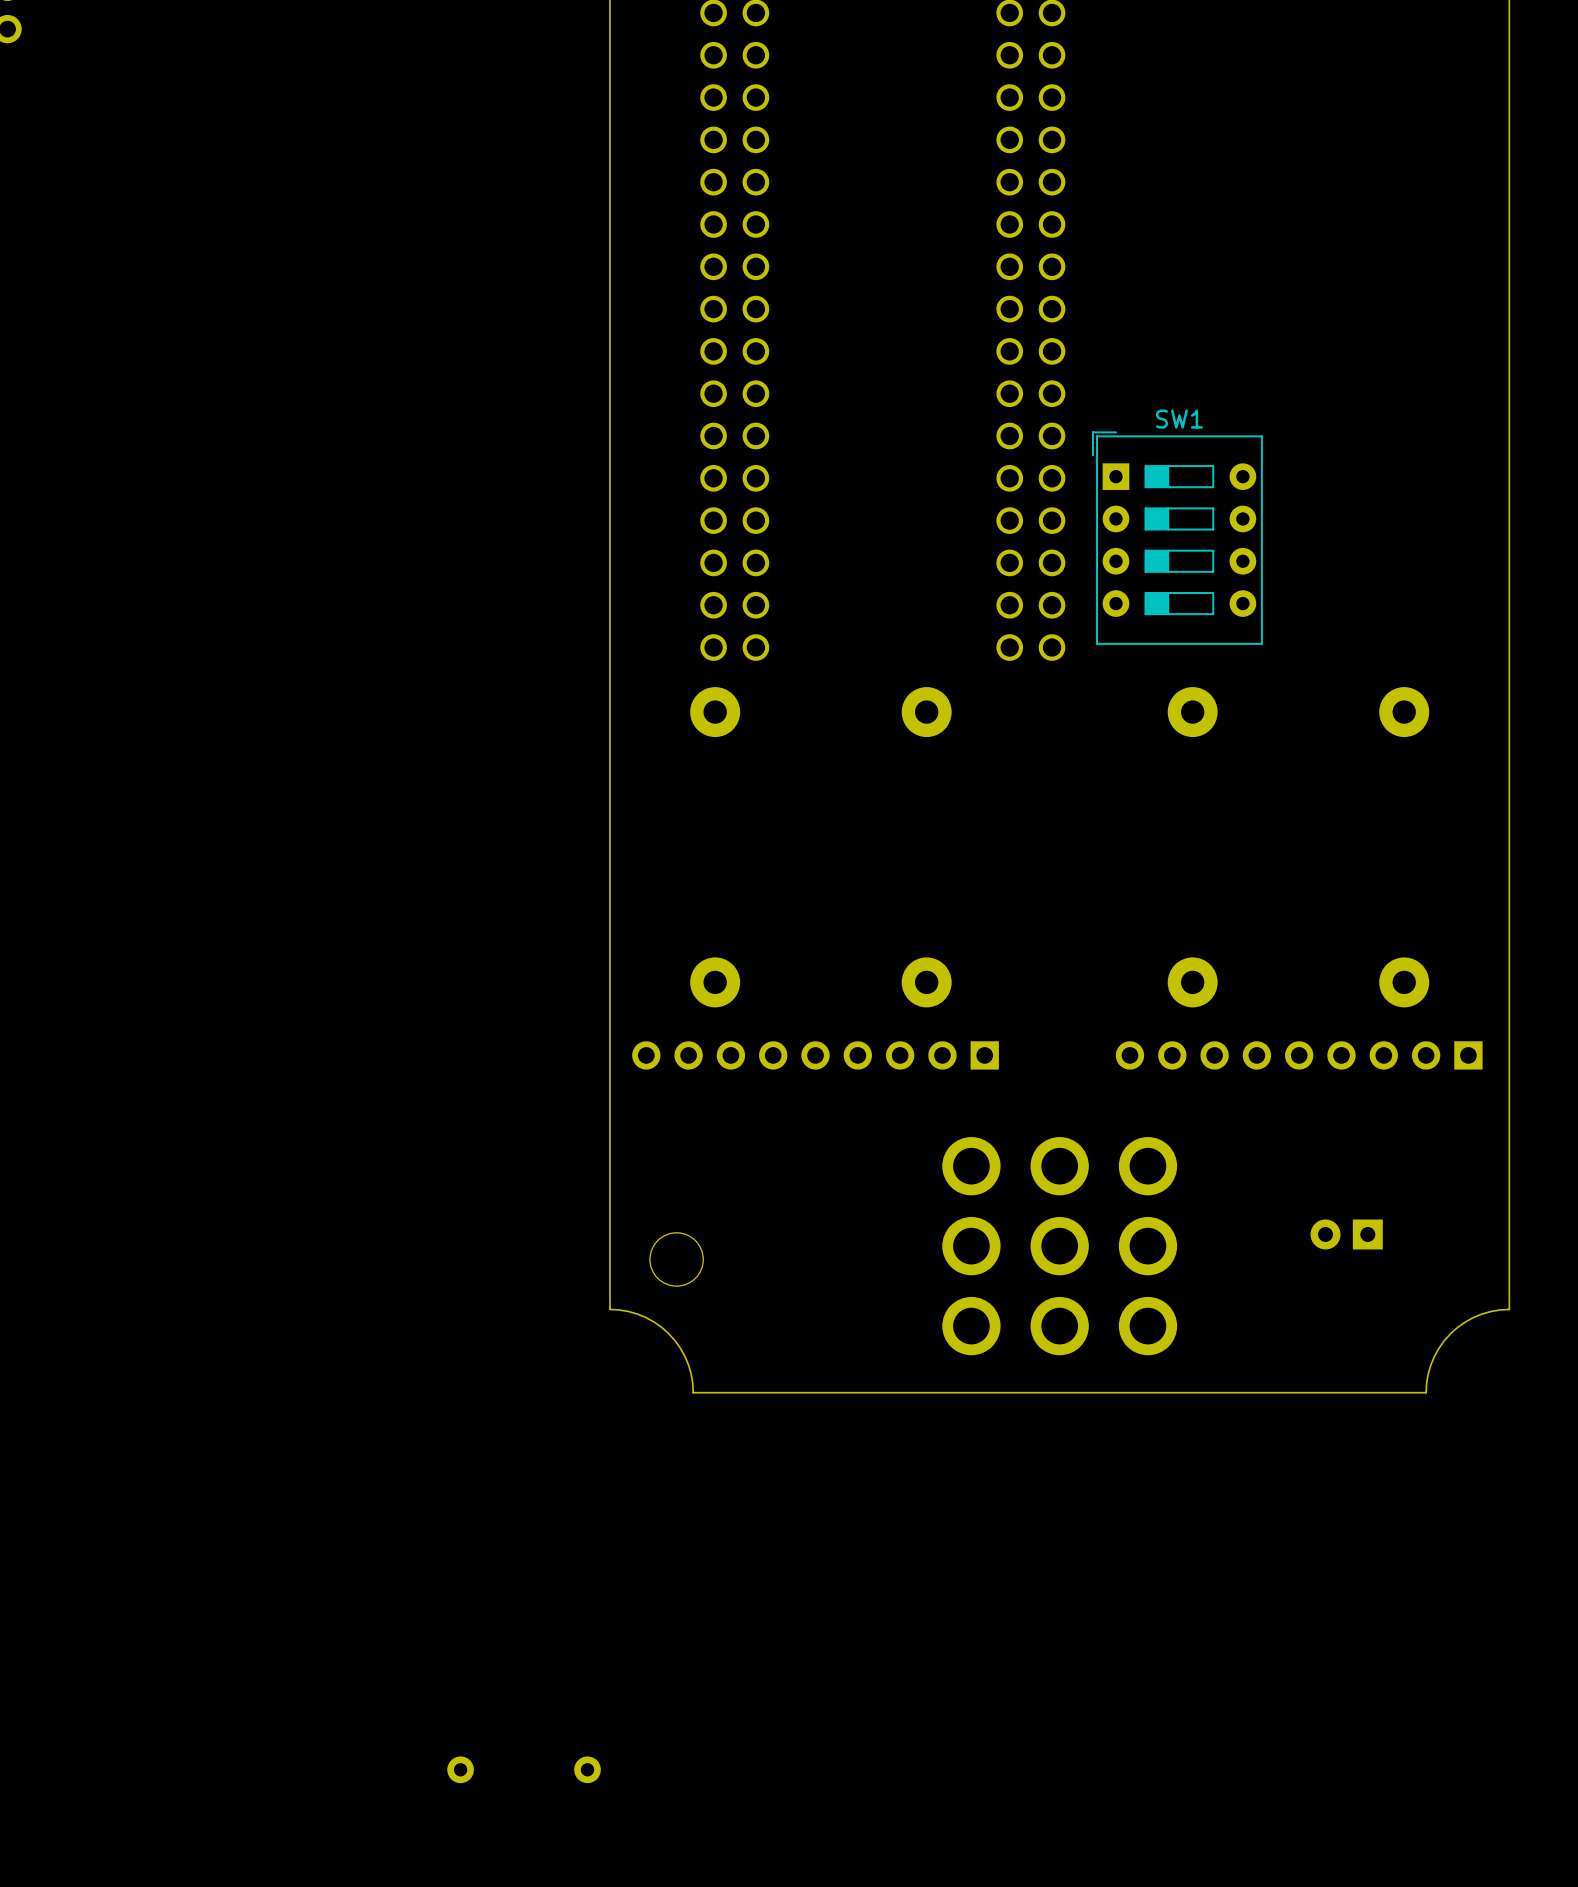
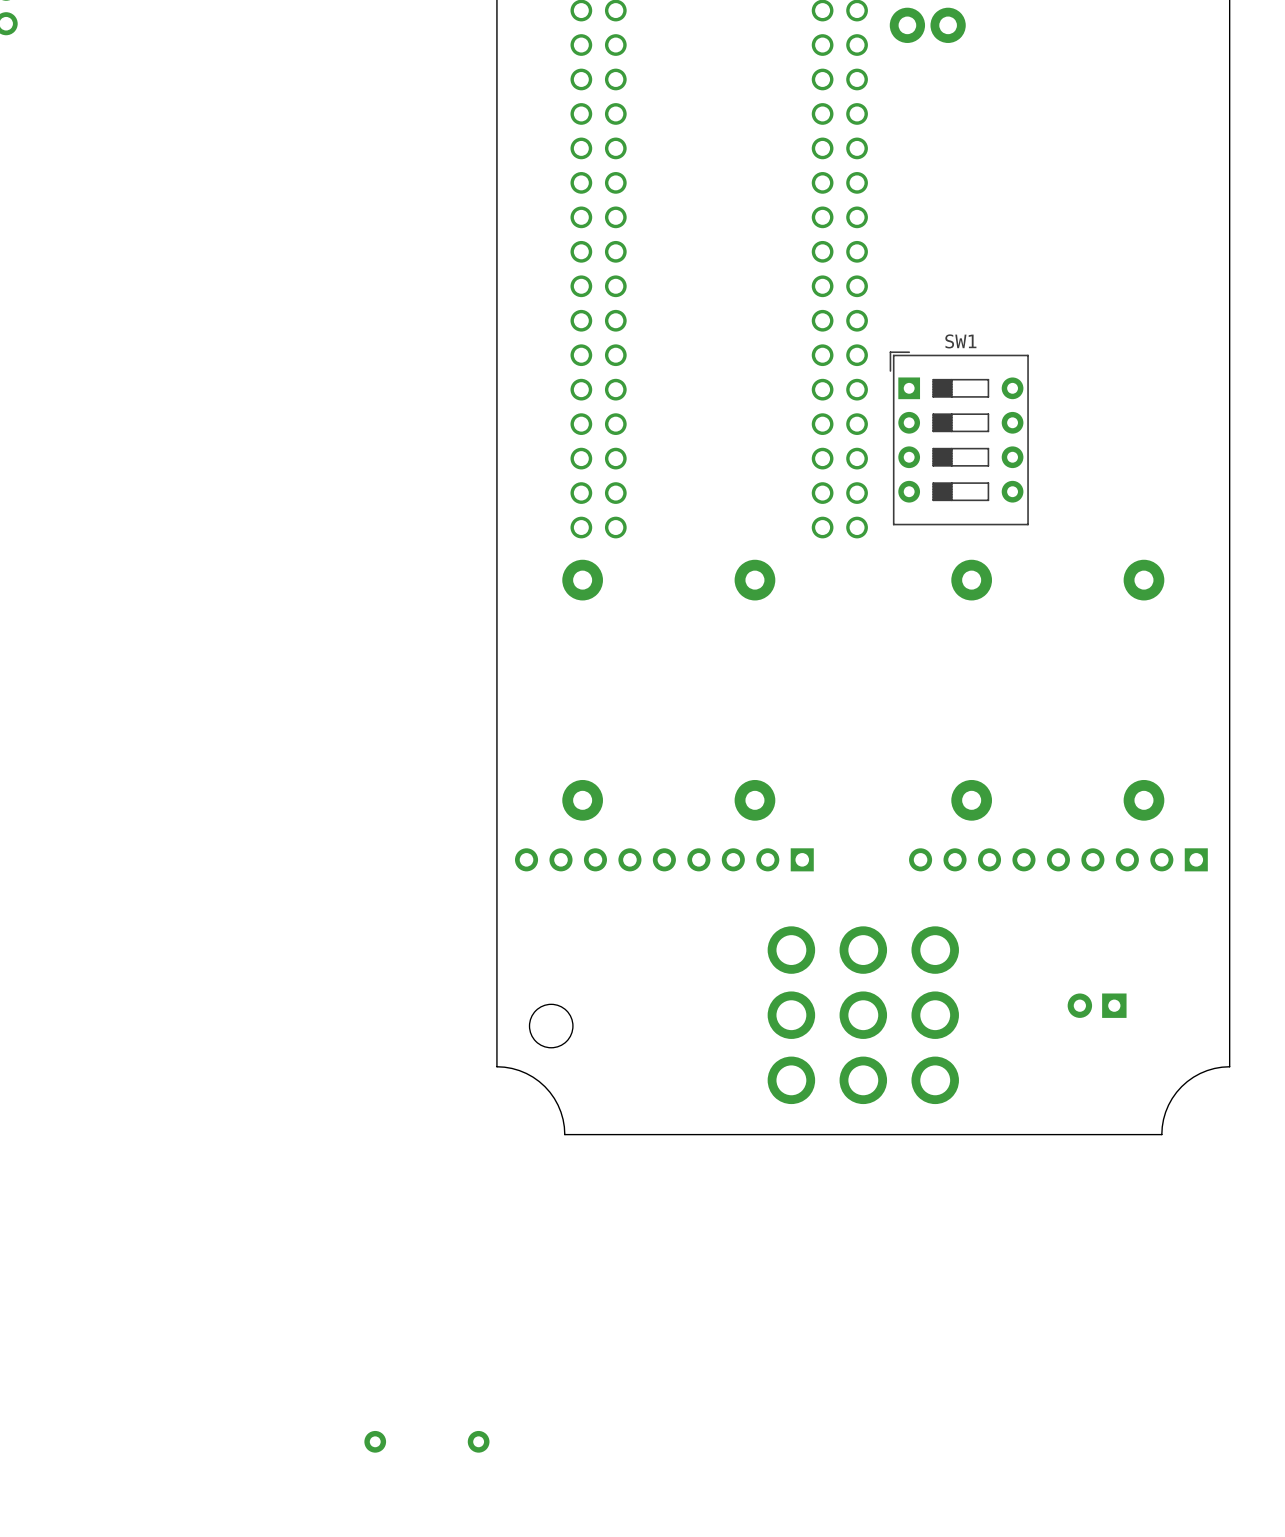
part: none -> (927, 25)

